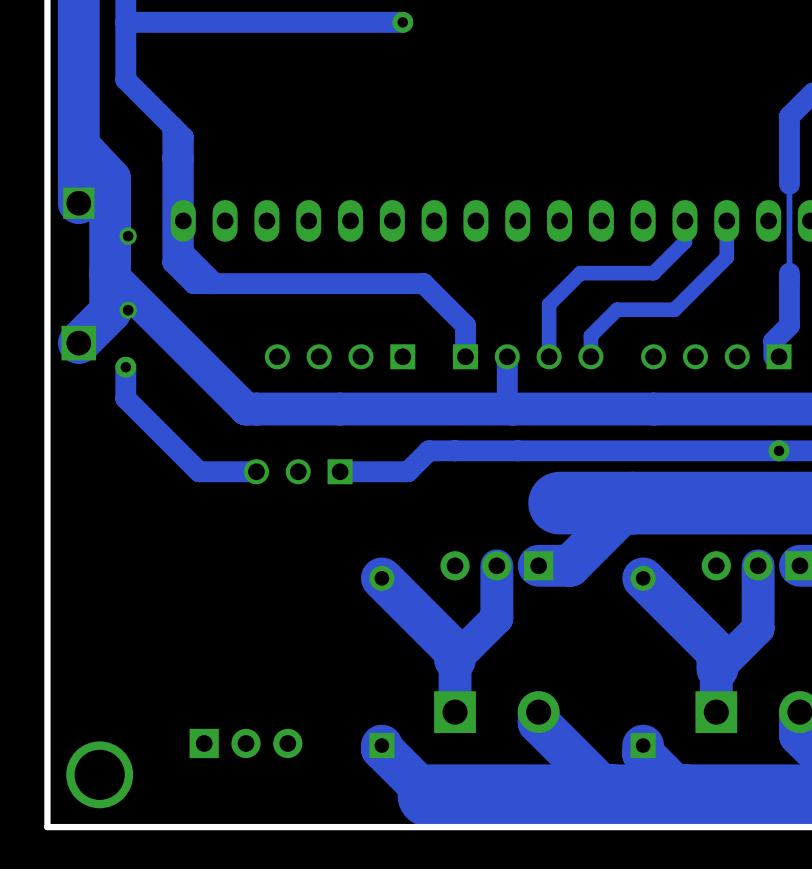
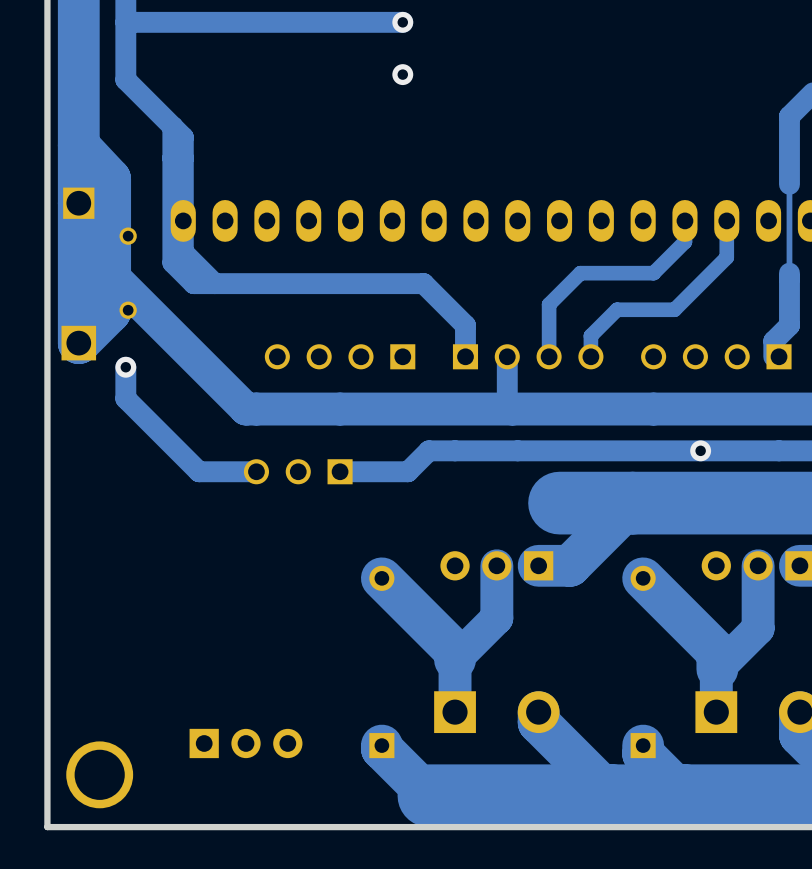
via: none -> (402, 74)
track: none -> (111, 236) (78, 203) (78, 343)
via position: (779, 450) -> (700, 450)

